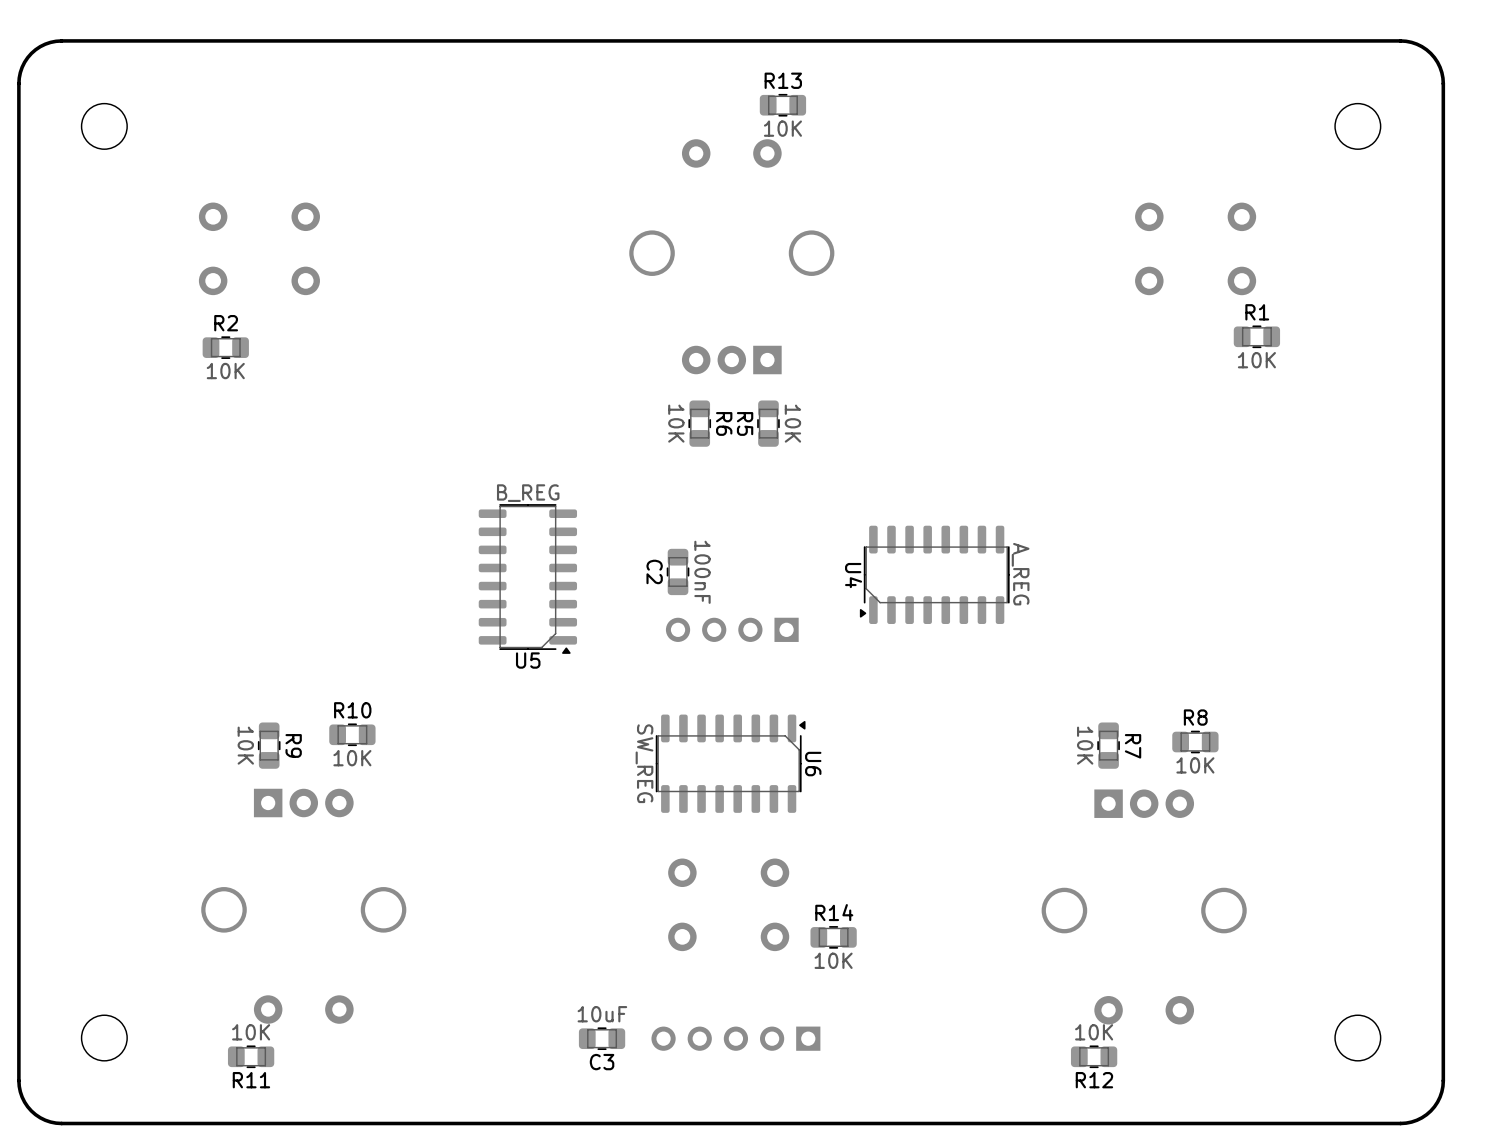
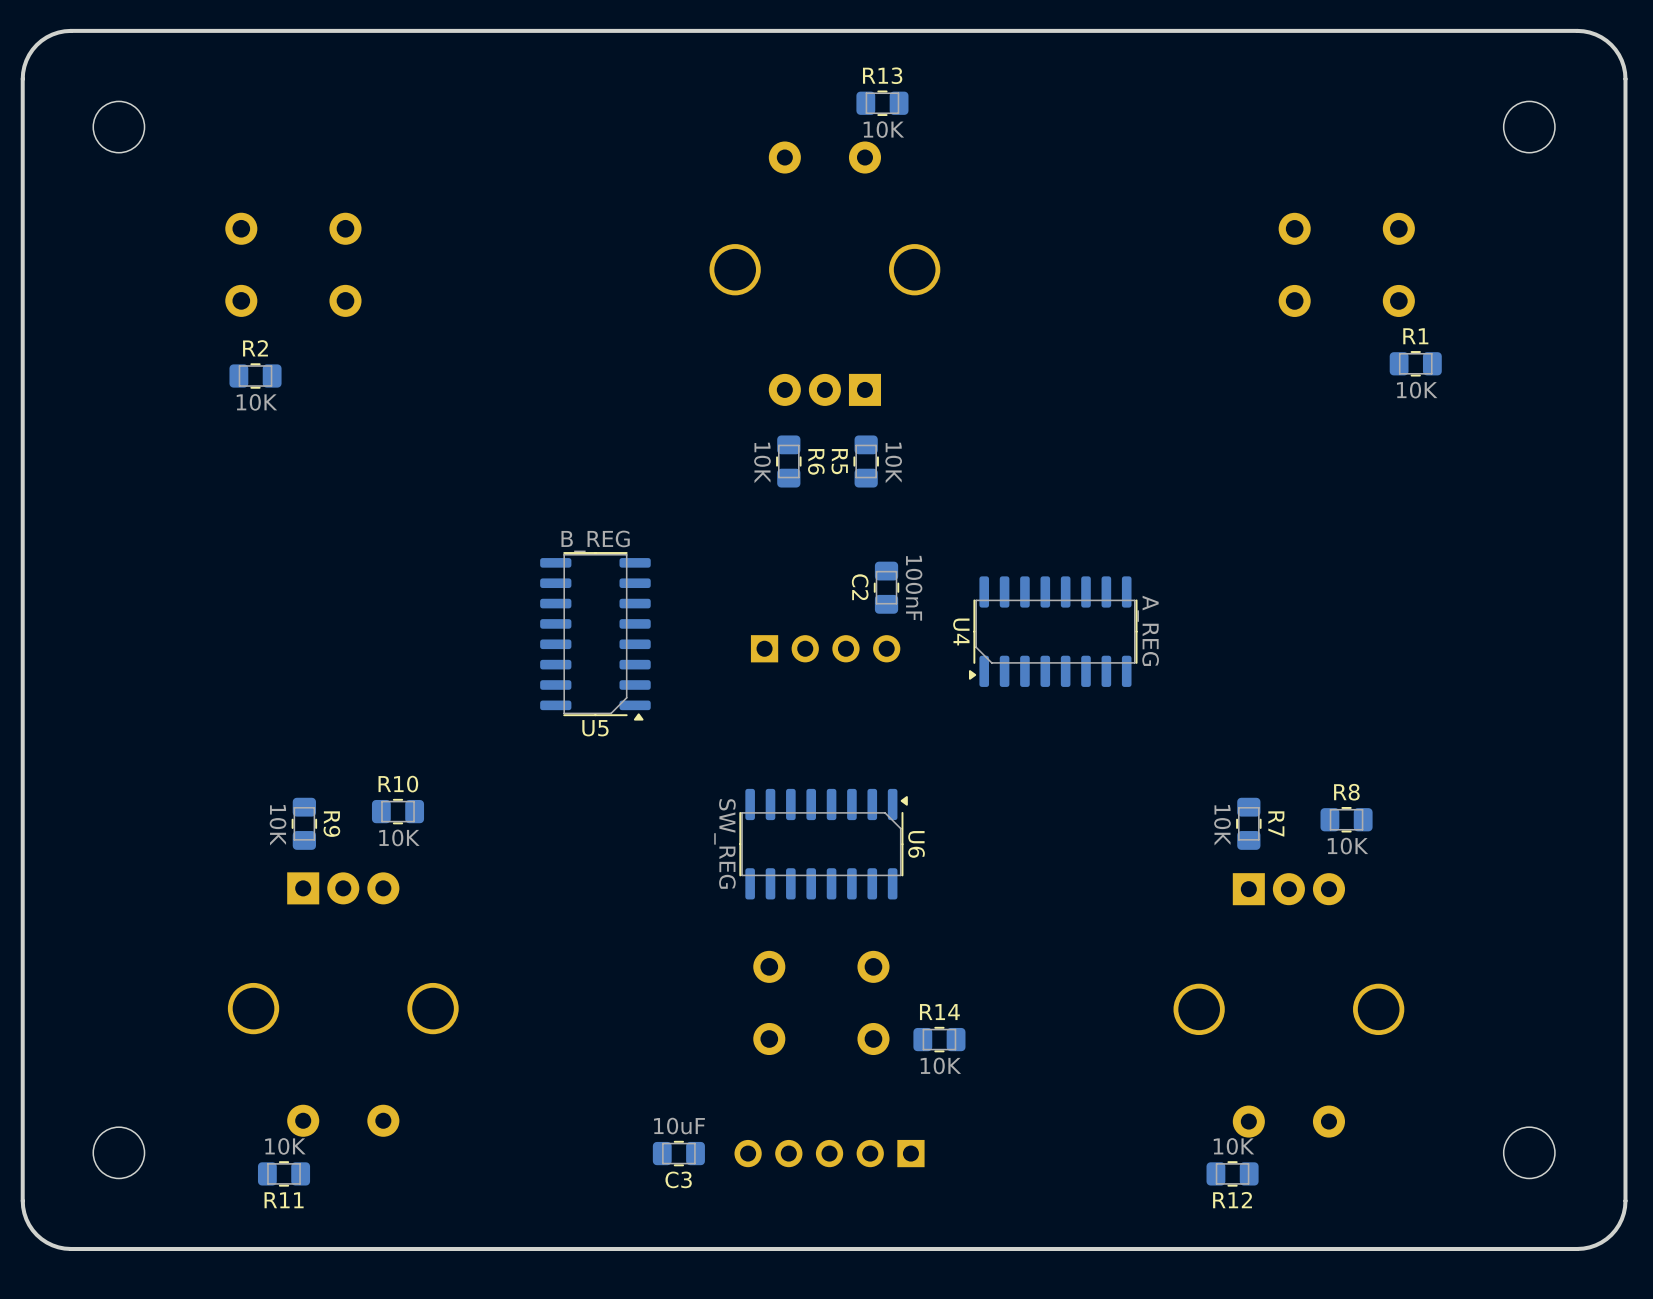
C2 position: (678, 571) -> (886, 587)
part rotation: 0° (732, 629) -> 180° (825, 648)

